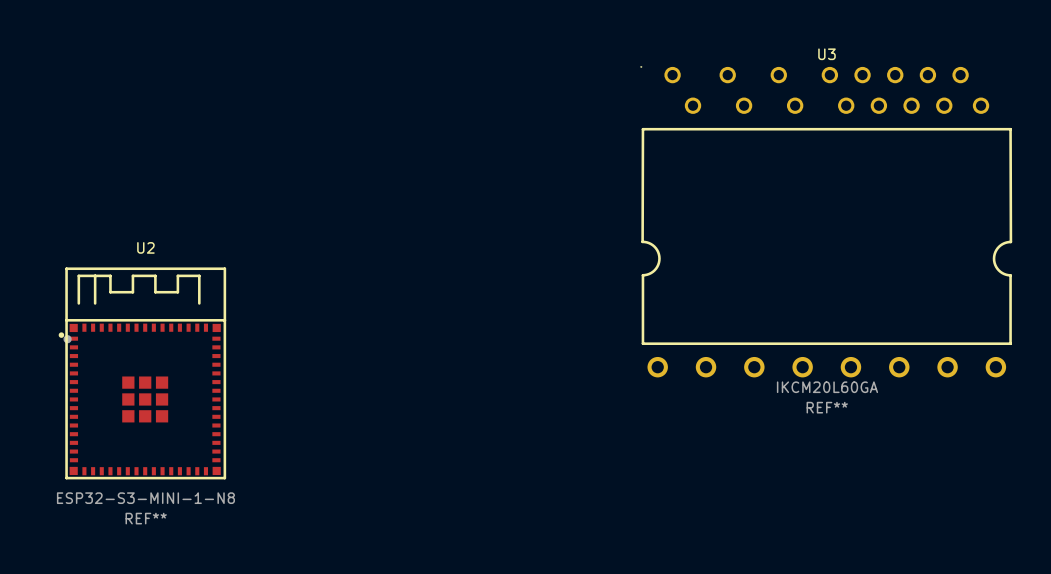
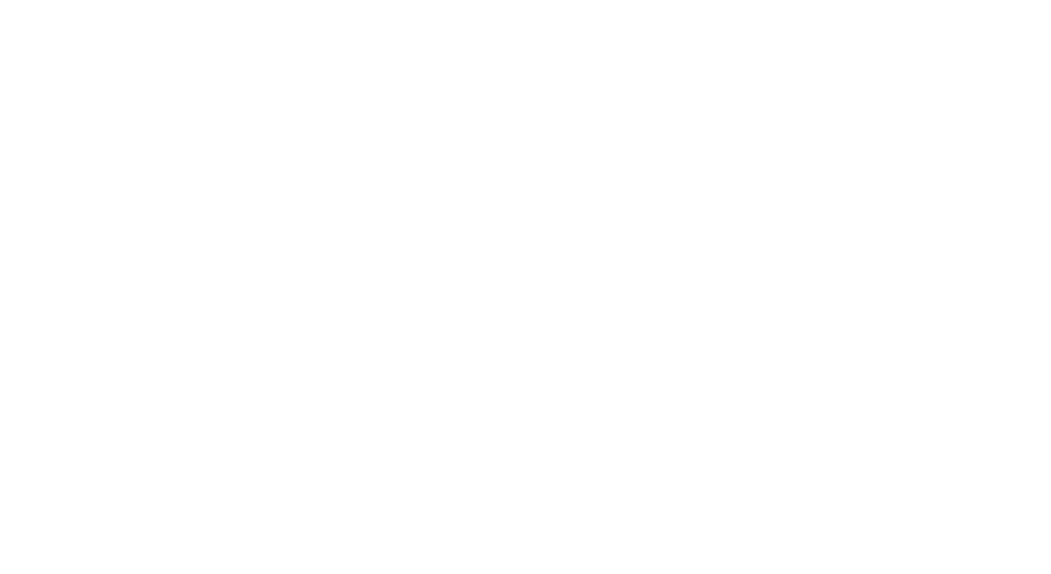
U3: IKCM20L60GA (826, 221) -> none
U2: ESP32-S3-MINI-1-N8 (142, 373) -> none

